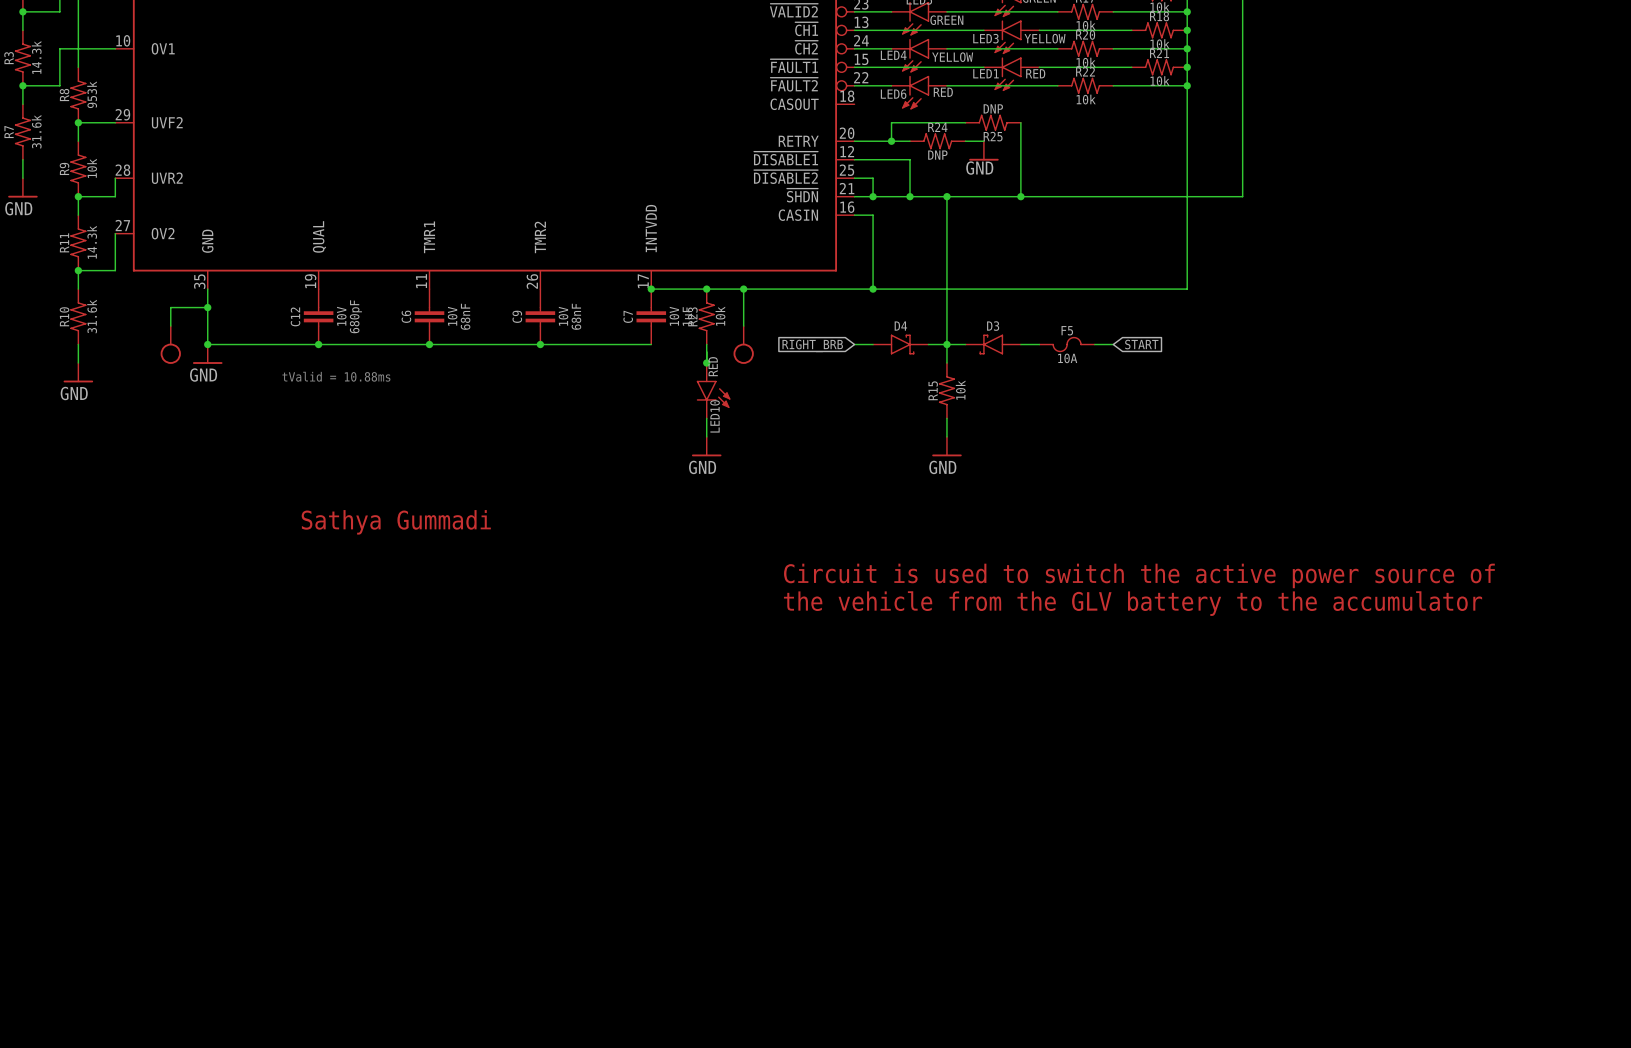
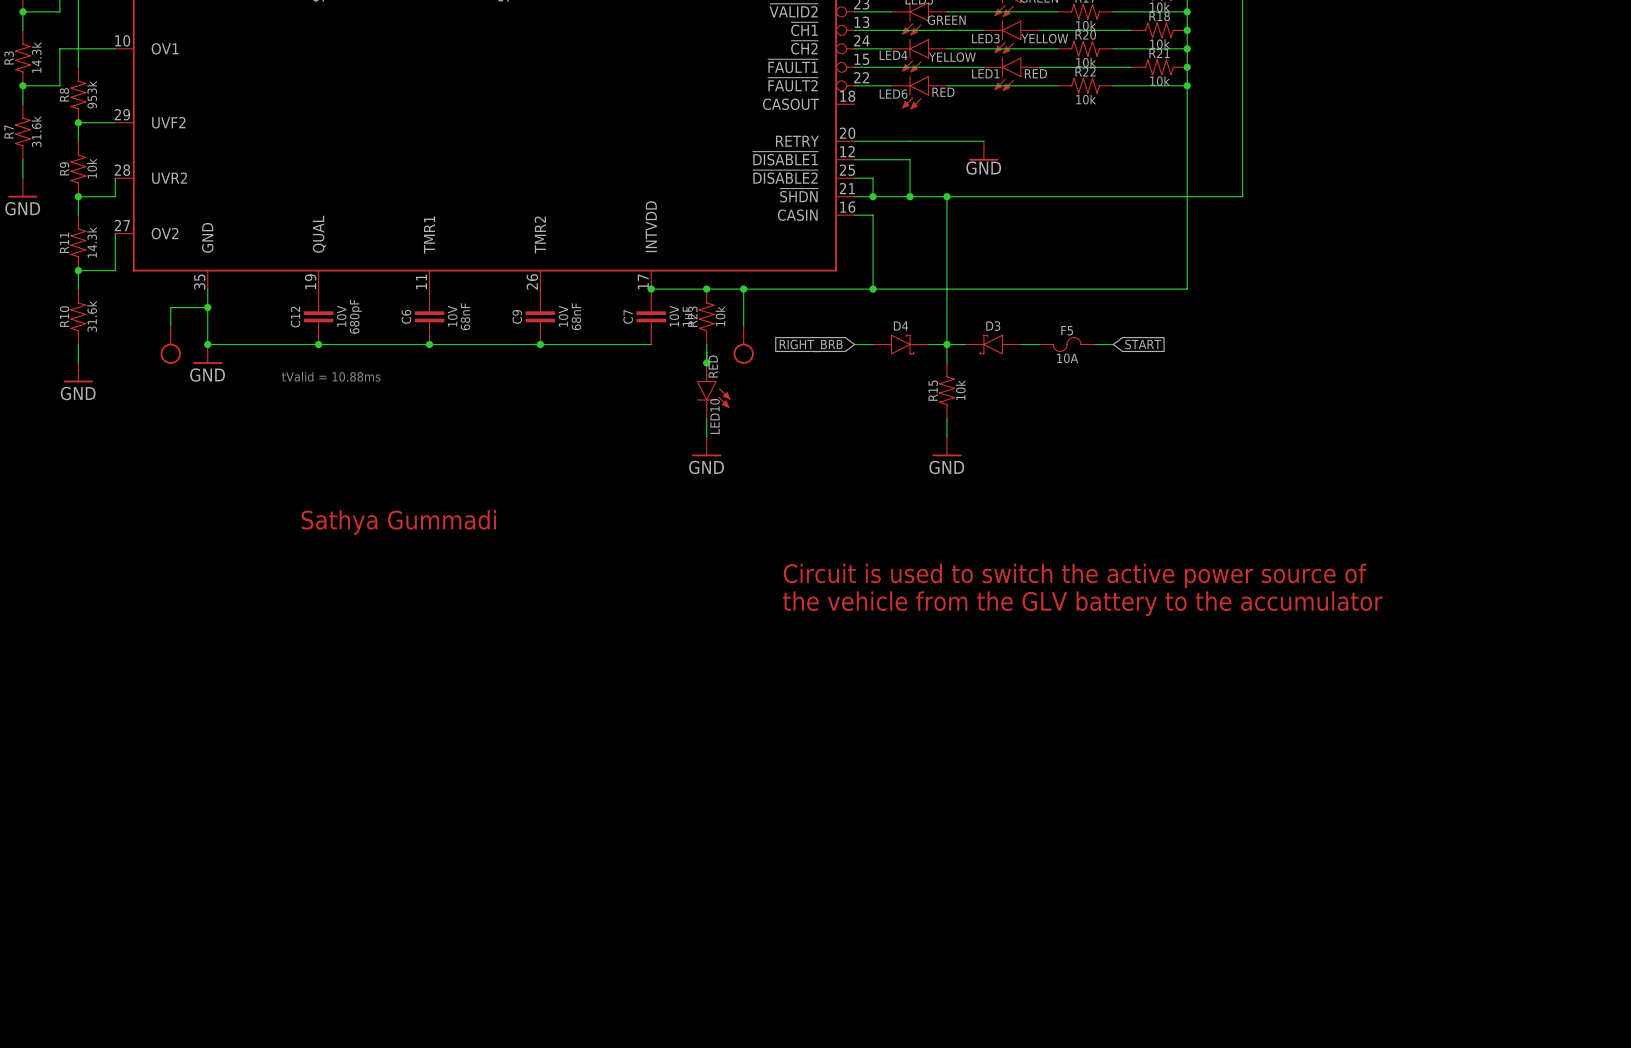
wire: (965, 122) (891, 122) (891, 141) -> none
R25: (993, 122) -> none
wire: (1020, 122) (1020, 196) -> none
junction: (891, 141) -> none
R24: (937, 141) -> none
junction: (1020, 196) -> none

